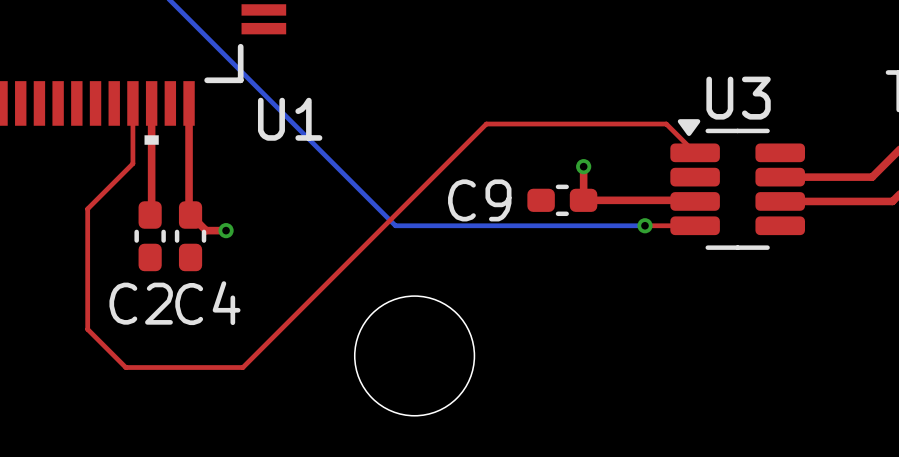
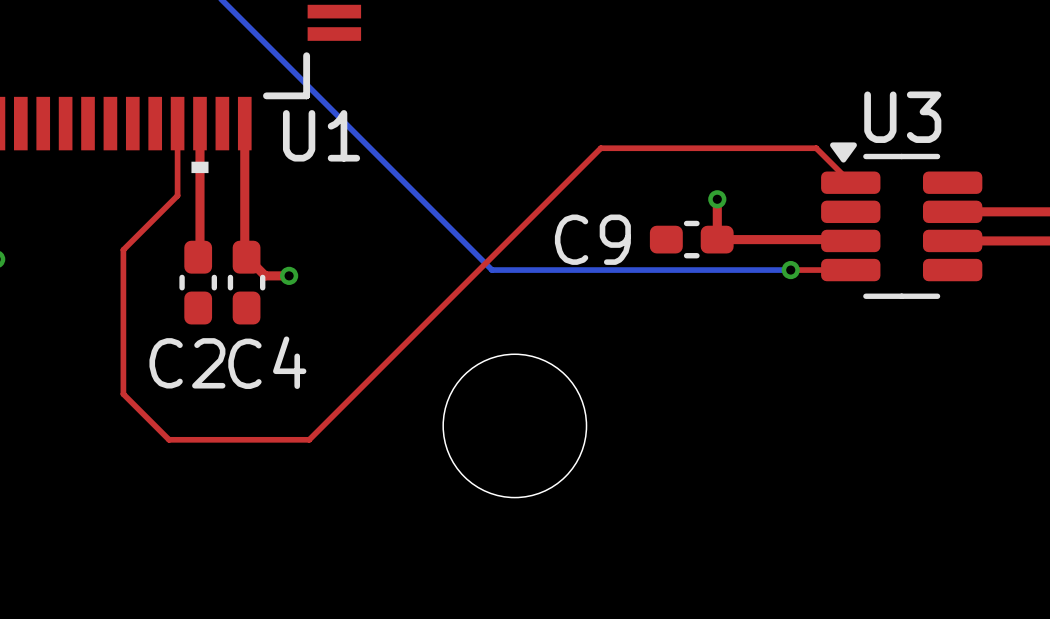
U1 name position: U1 (290, 119) -> U1 (321, 135)

